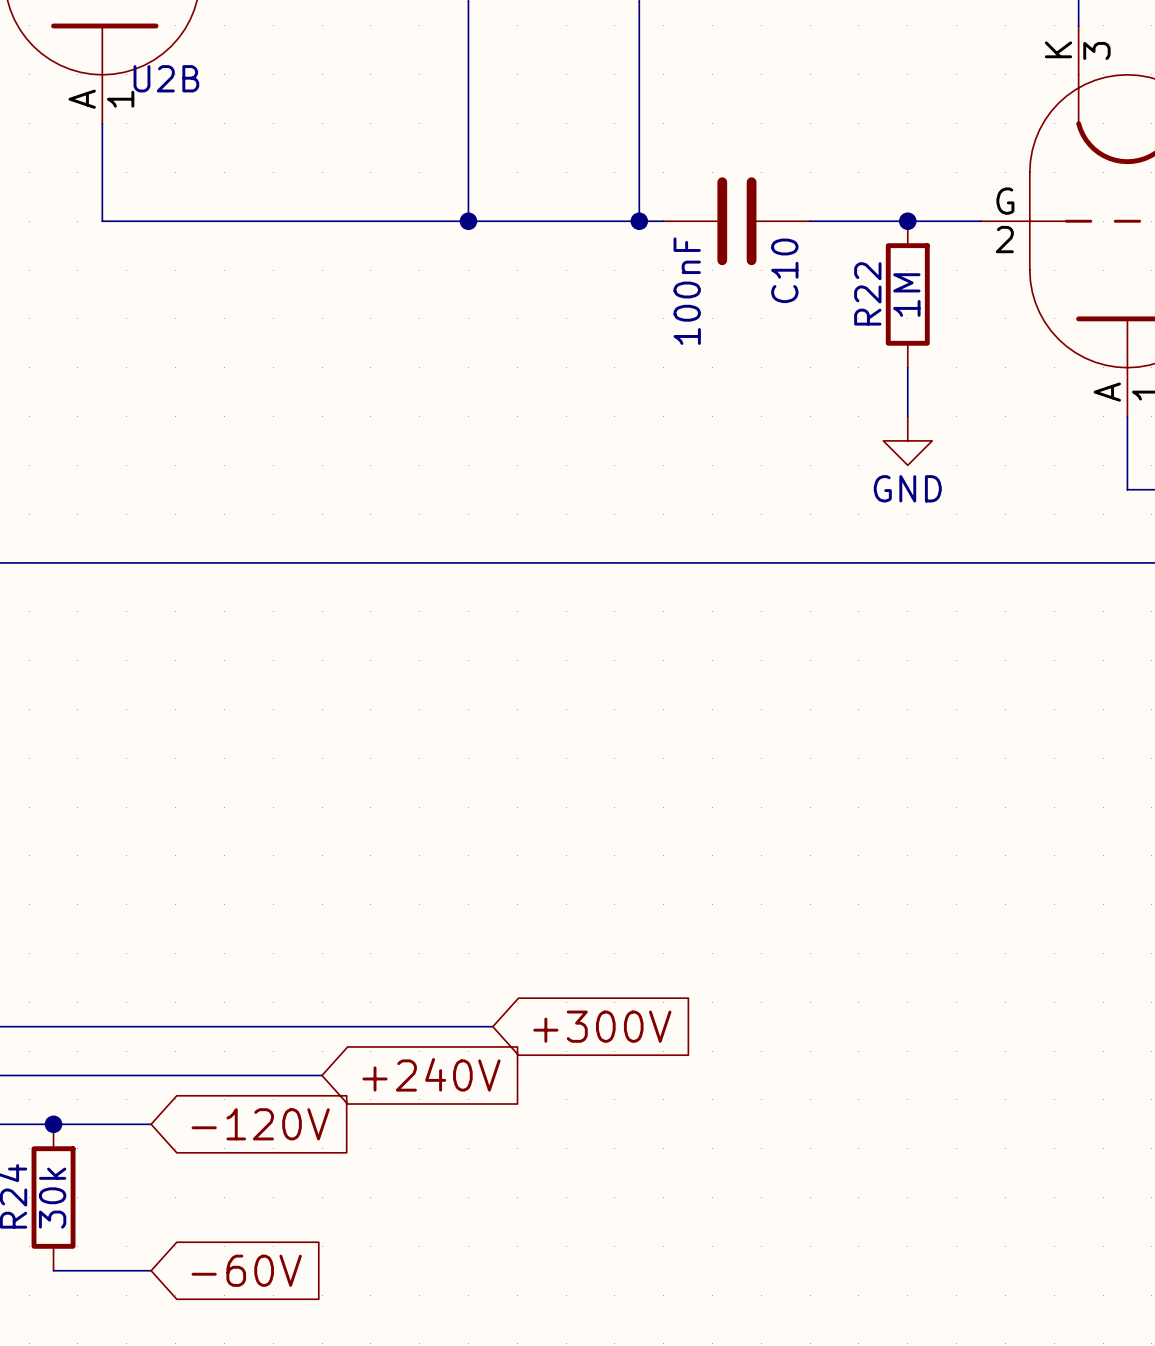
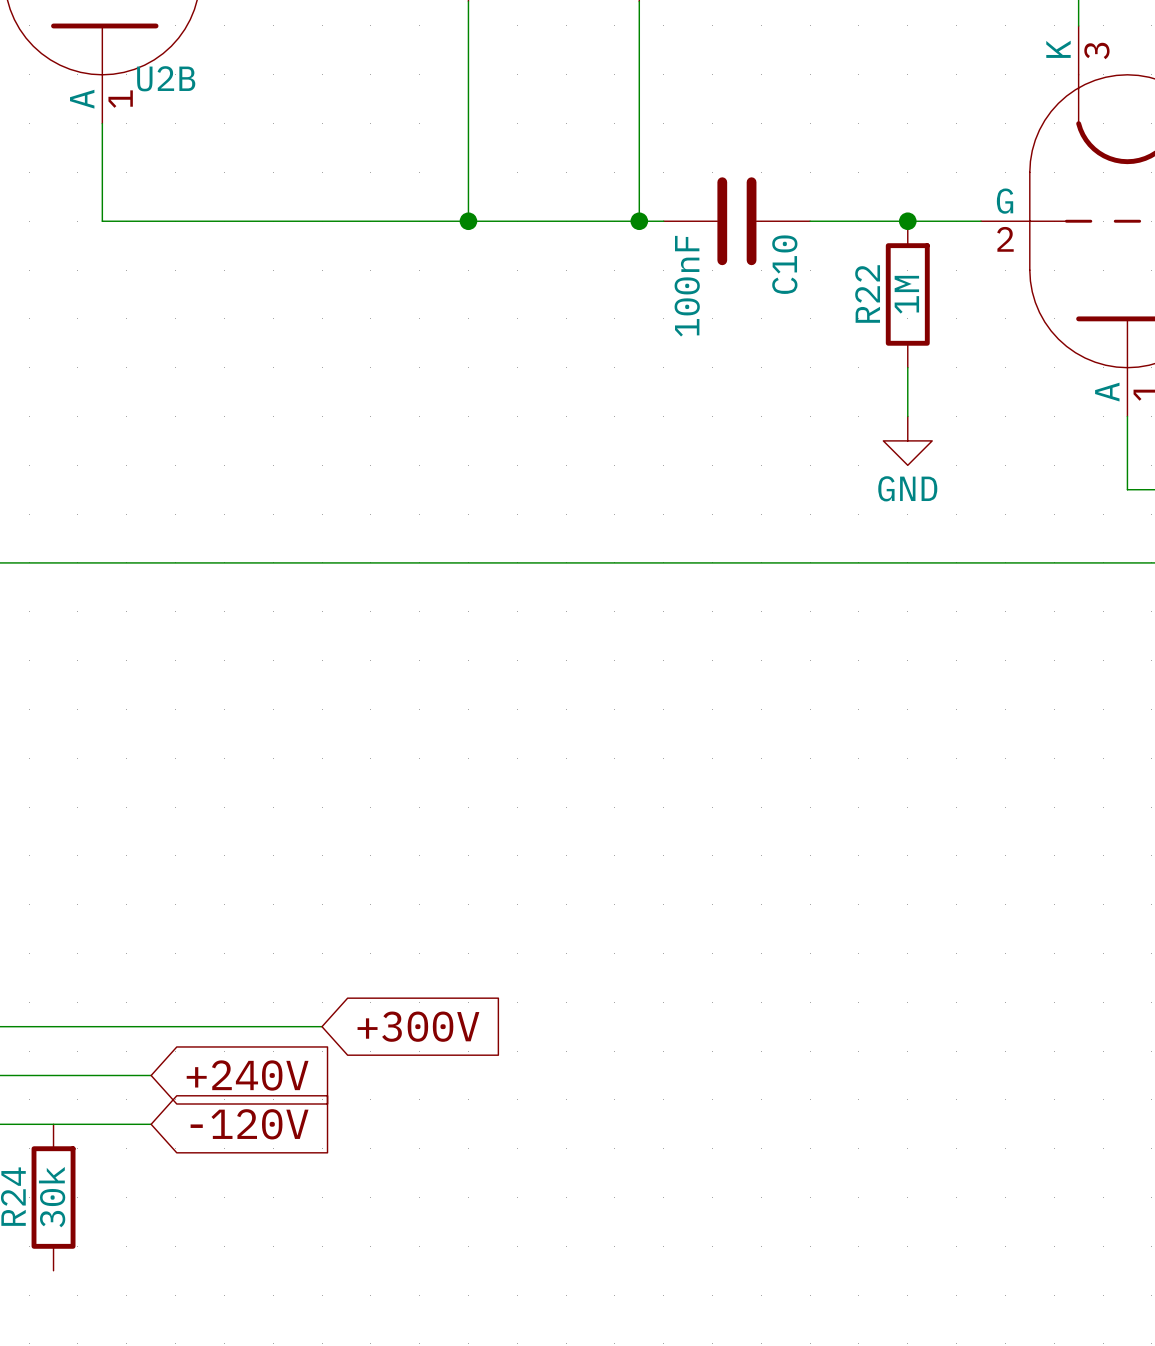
wire: (322, 1026) (492, 1026) -> none
global label position: +300V (602, 1026) -> +300V (418, 1026)
global label position: +240V (431, 1074) -> +240V (247, 1075)
wire: (151, 1075) (322, 1075) -> none
junction: (53, 1124) -> none
wire: (53, 1270) (151, 1270) -> none
global label: -60V (246, 1270) -> none

